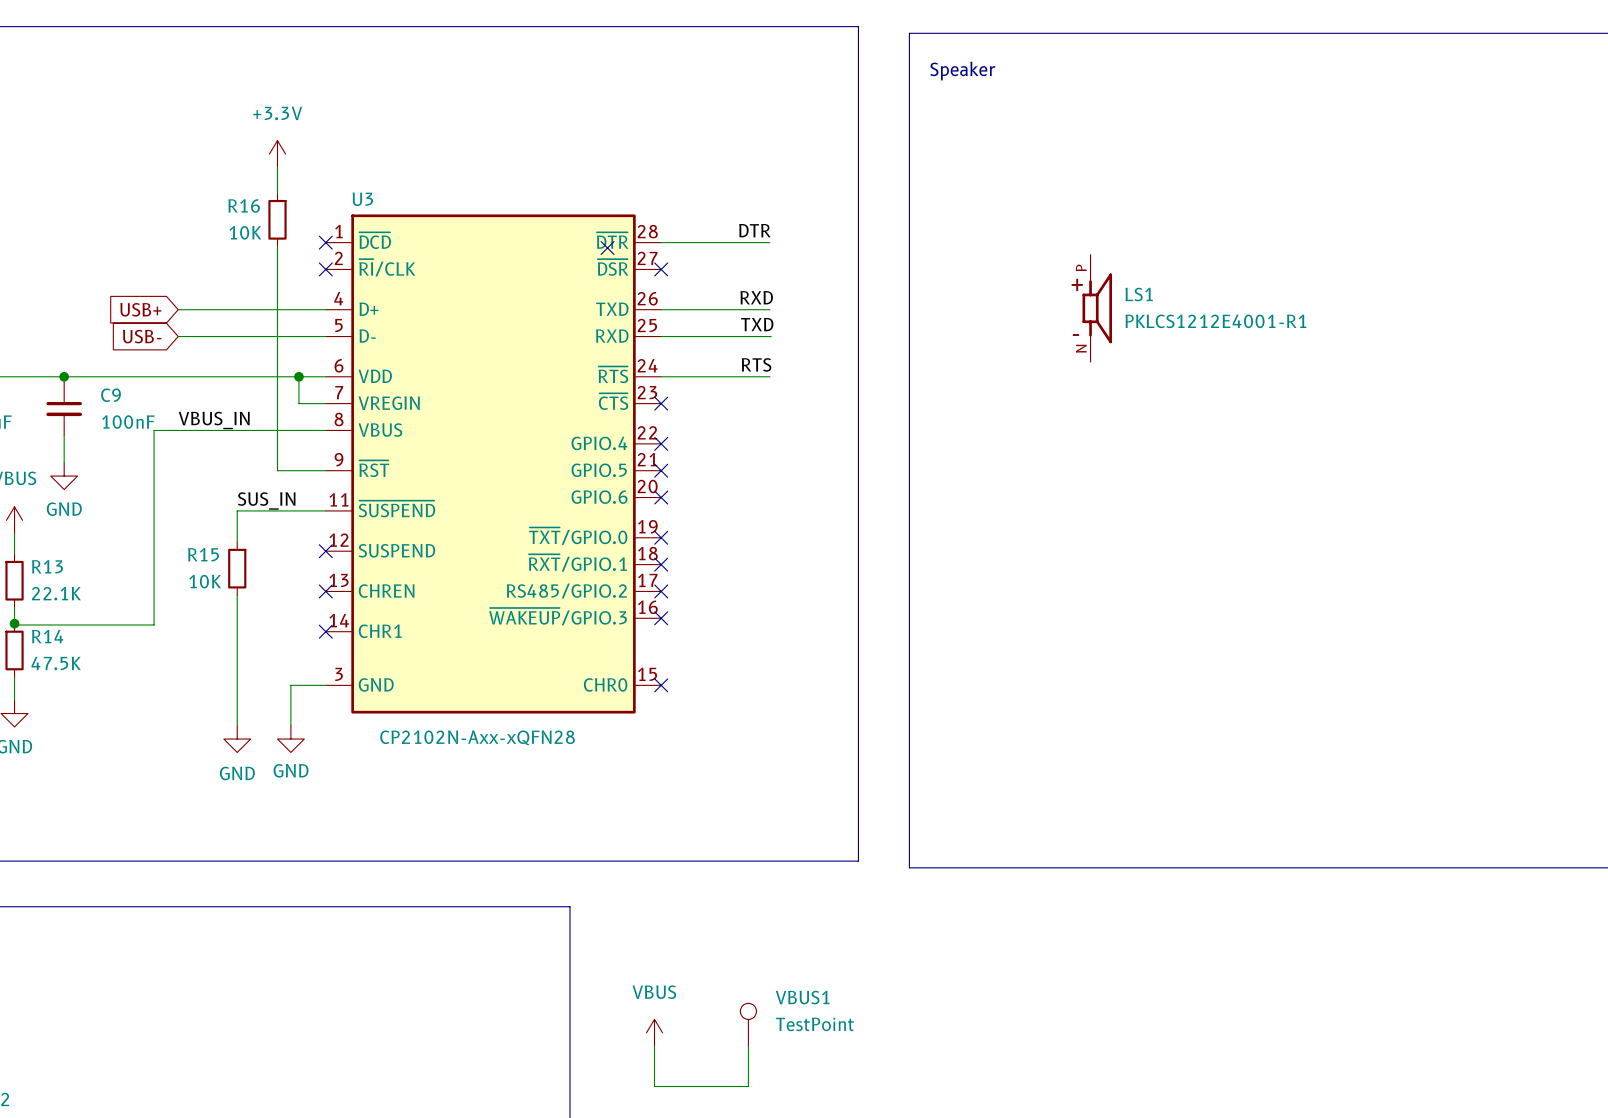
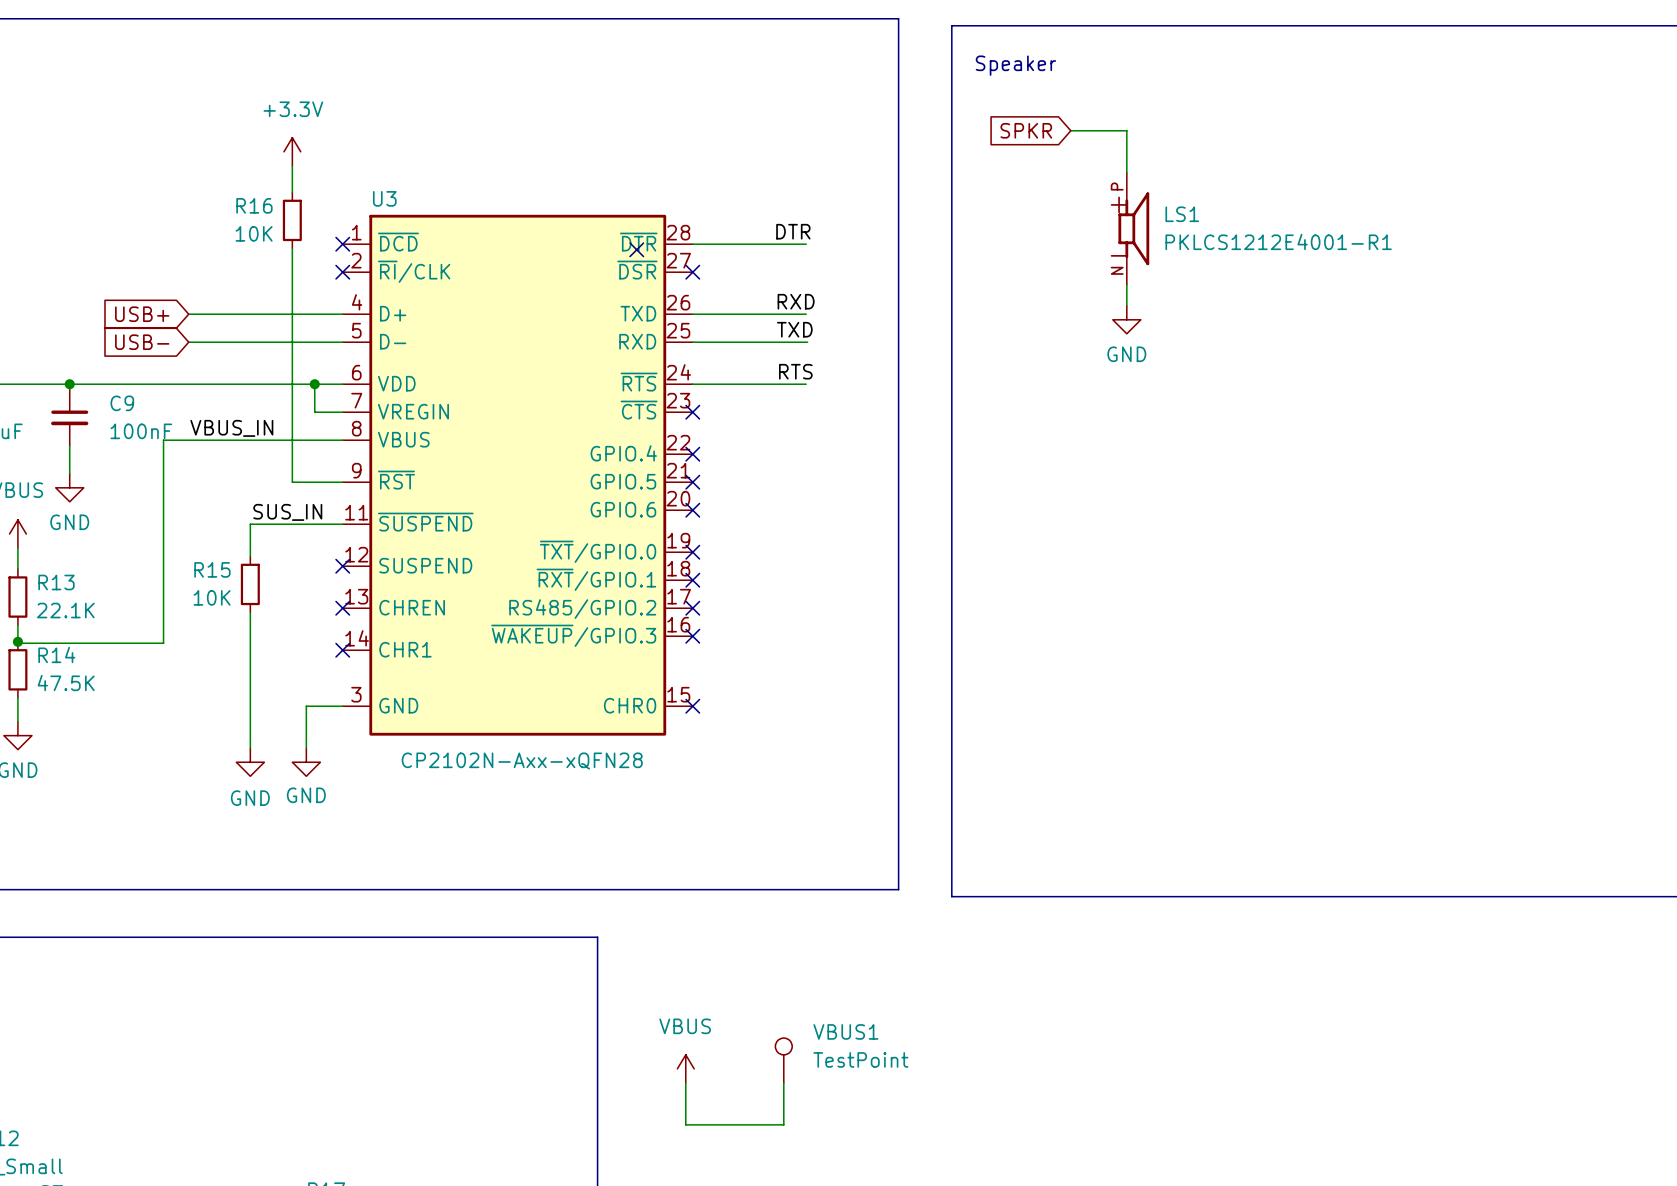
wire: none -> (1070, 130) (1126, 130) (1126, 172)
global label: none -> SPKR (1026, 130)
wire: none -> (1126, 284) (1126, 305)
LS1 position: (1097, 308) -> (1133, 228)
power symbol: none -> GND (1126, 319)

